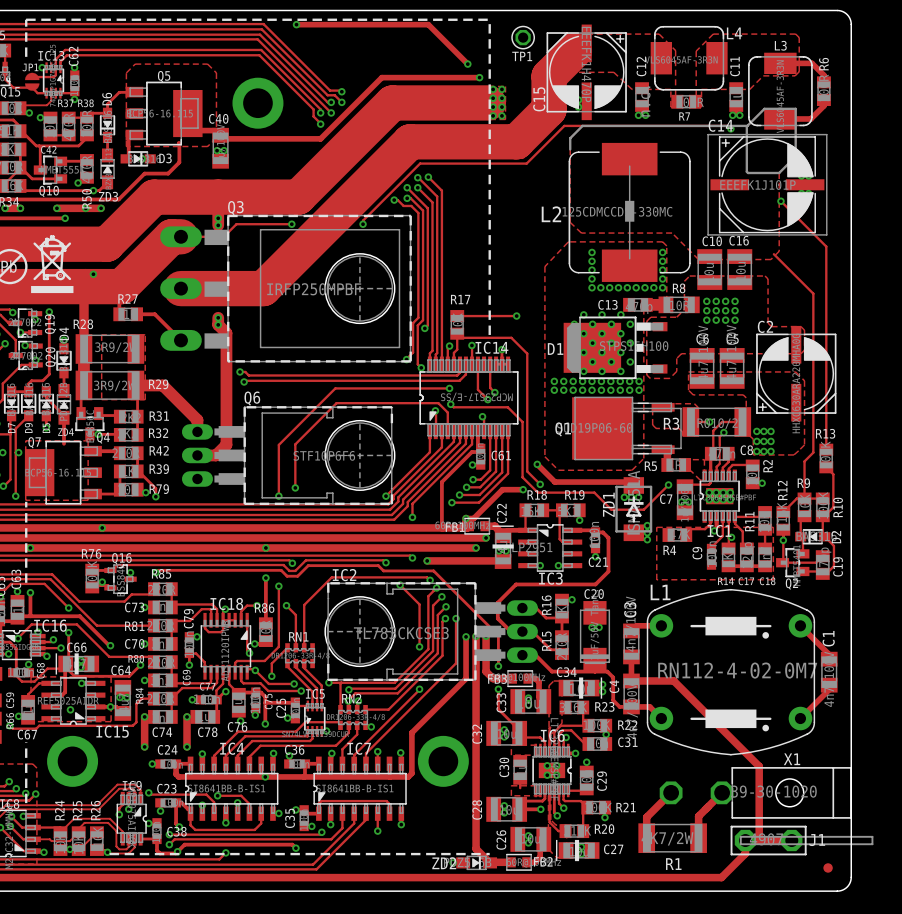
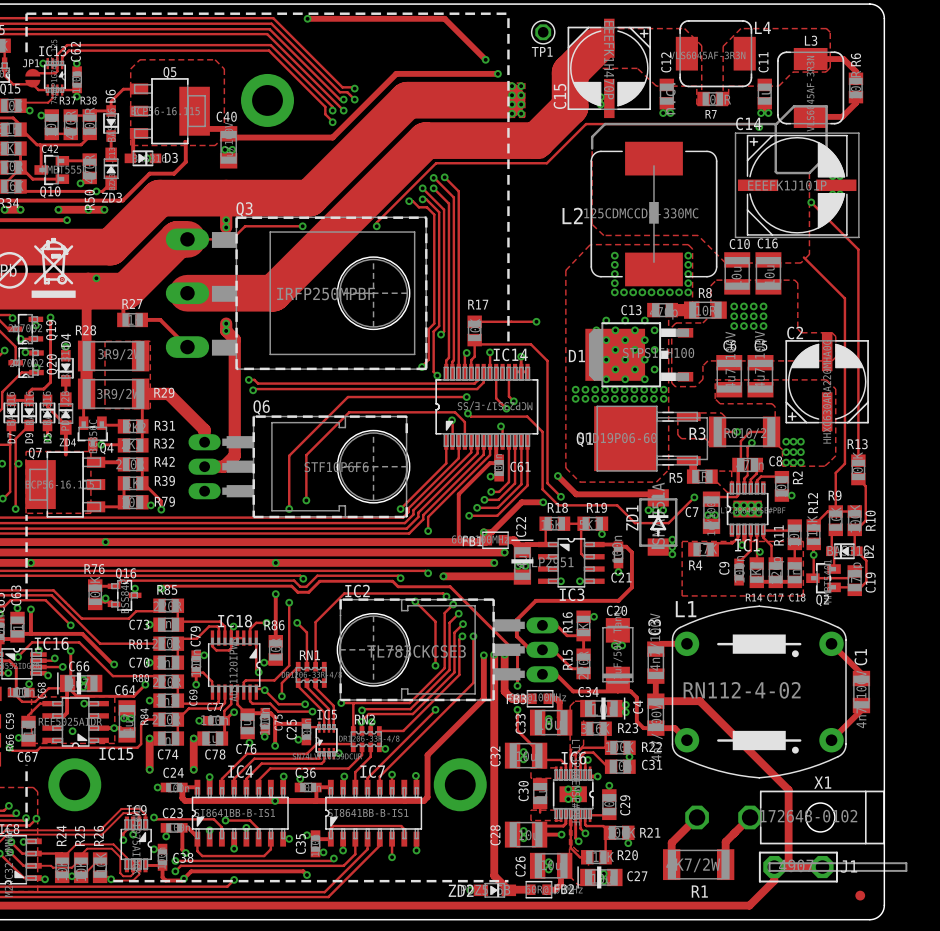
L1 value: RN112-4-02-0M7 (737, 670) -> RN112-4-02 (742, 690)
X1 value: 39-30-1020 (773, 791) -> 172648-0102 (808, 816)

